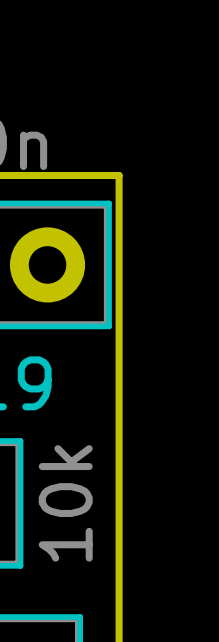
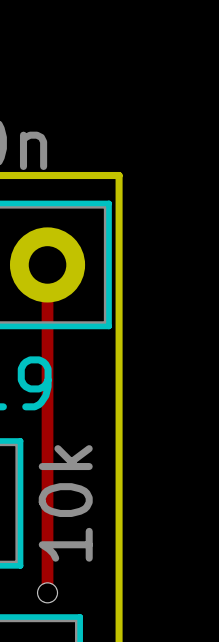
track: none -> (47, 264) (47, 592)
via: none -> (47, 592)

